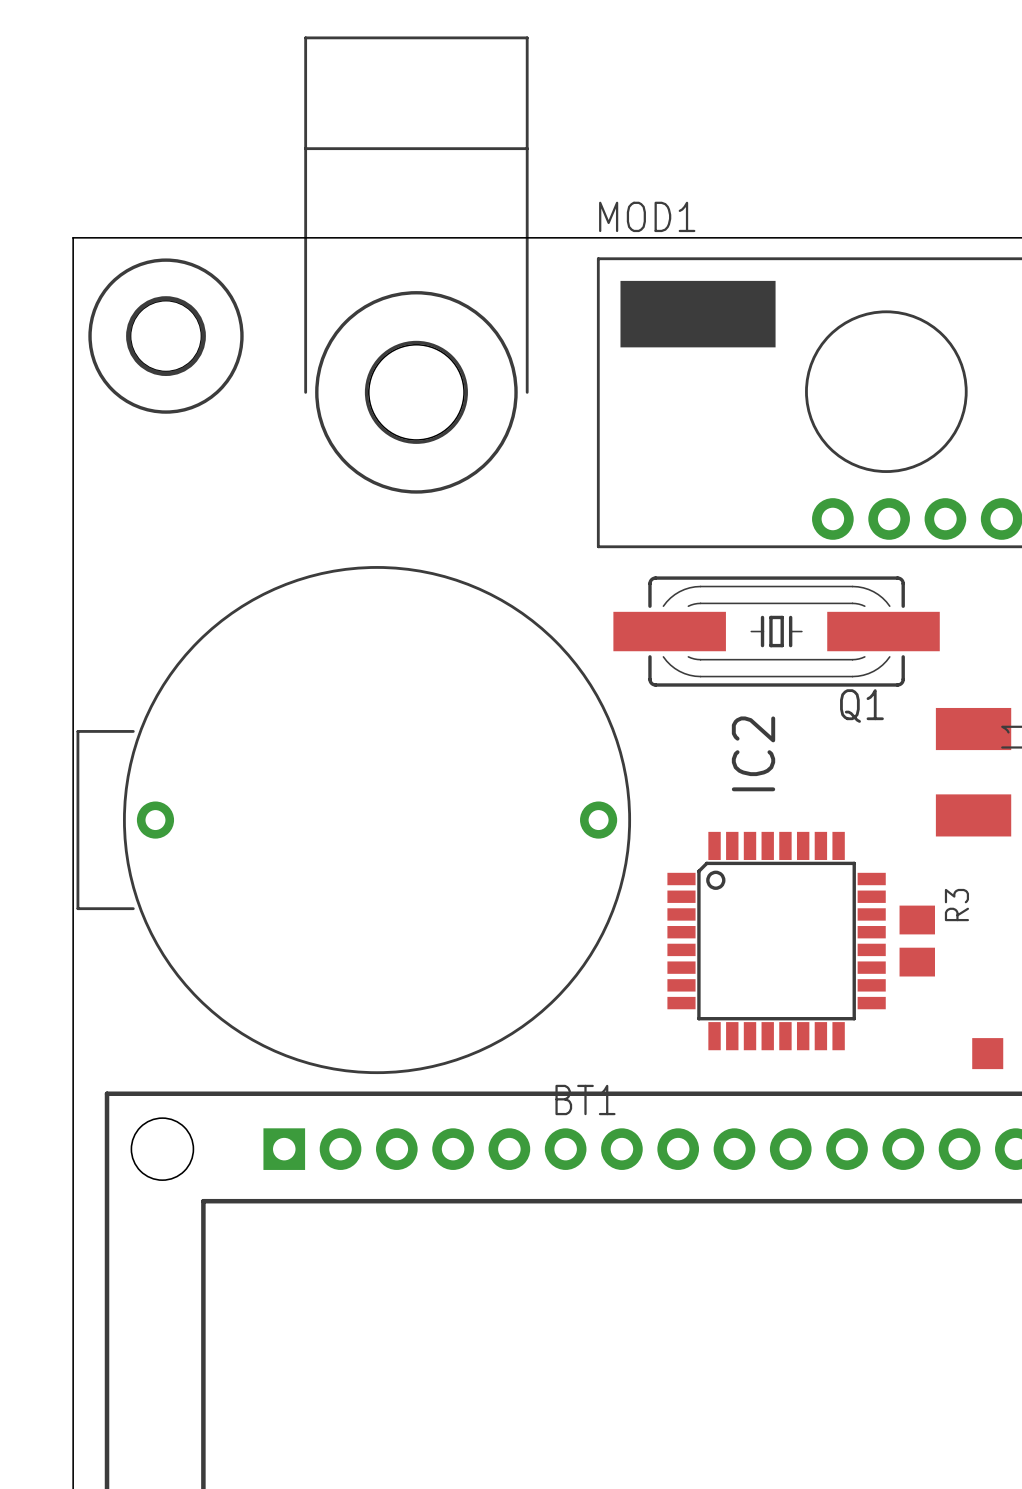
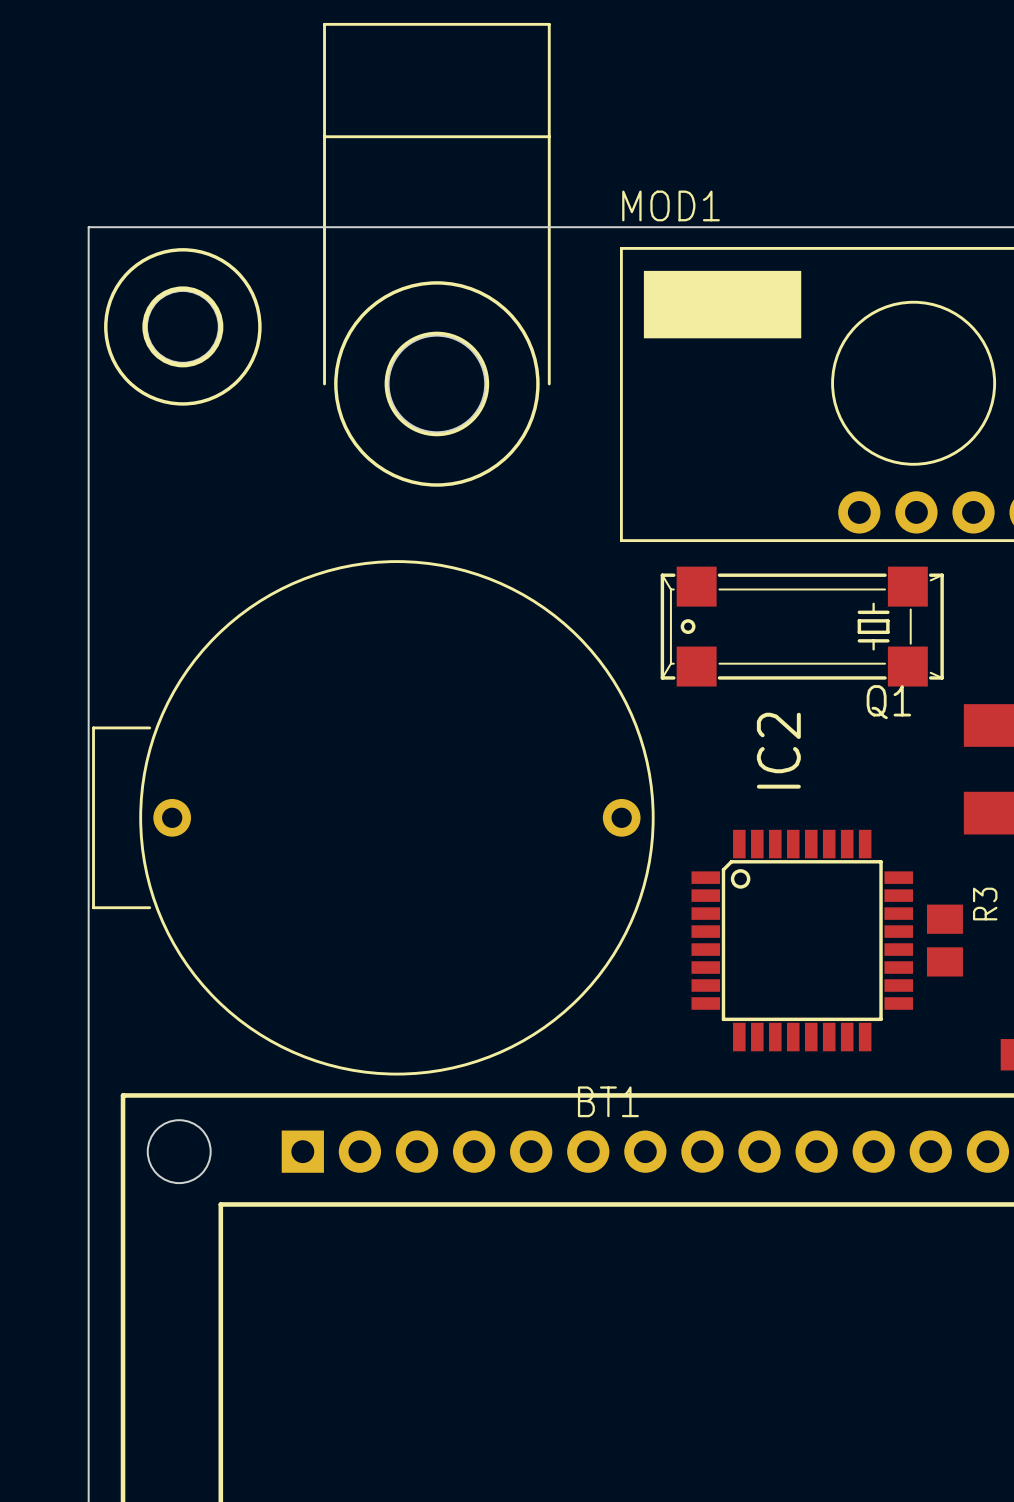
Q1 footprint: [613, 576, 940, 687] -> [660, 566, 944, 687]

